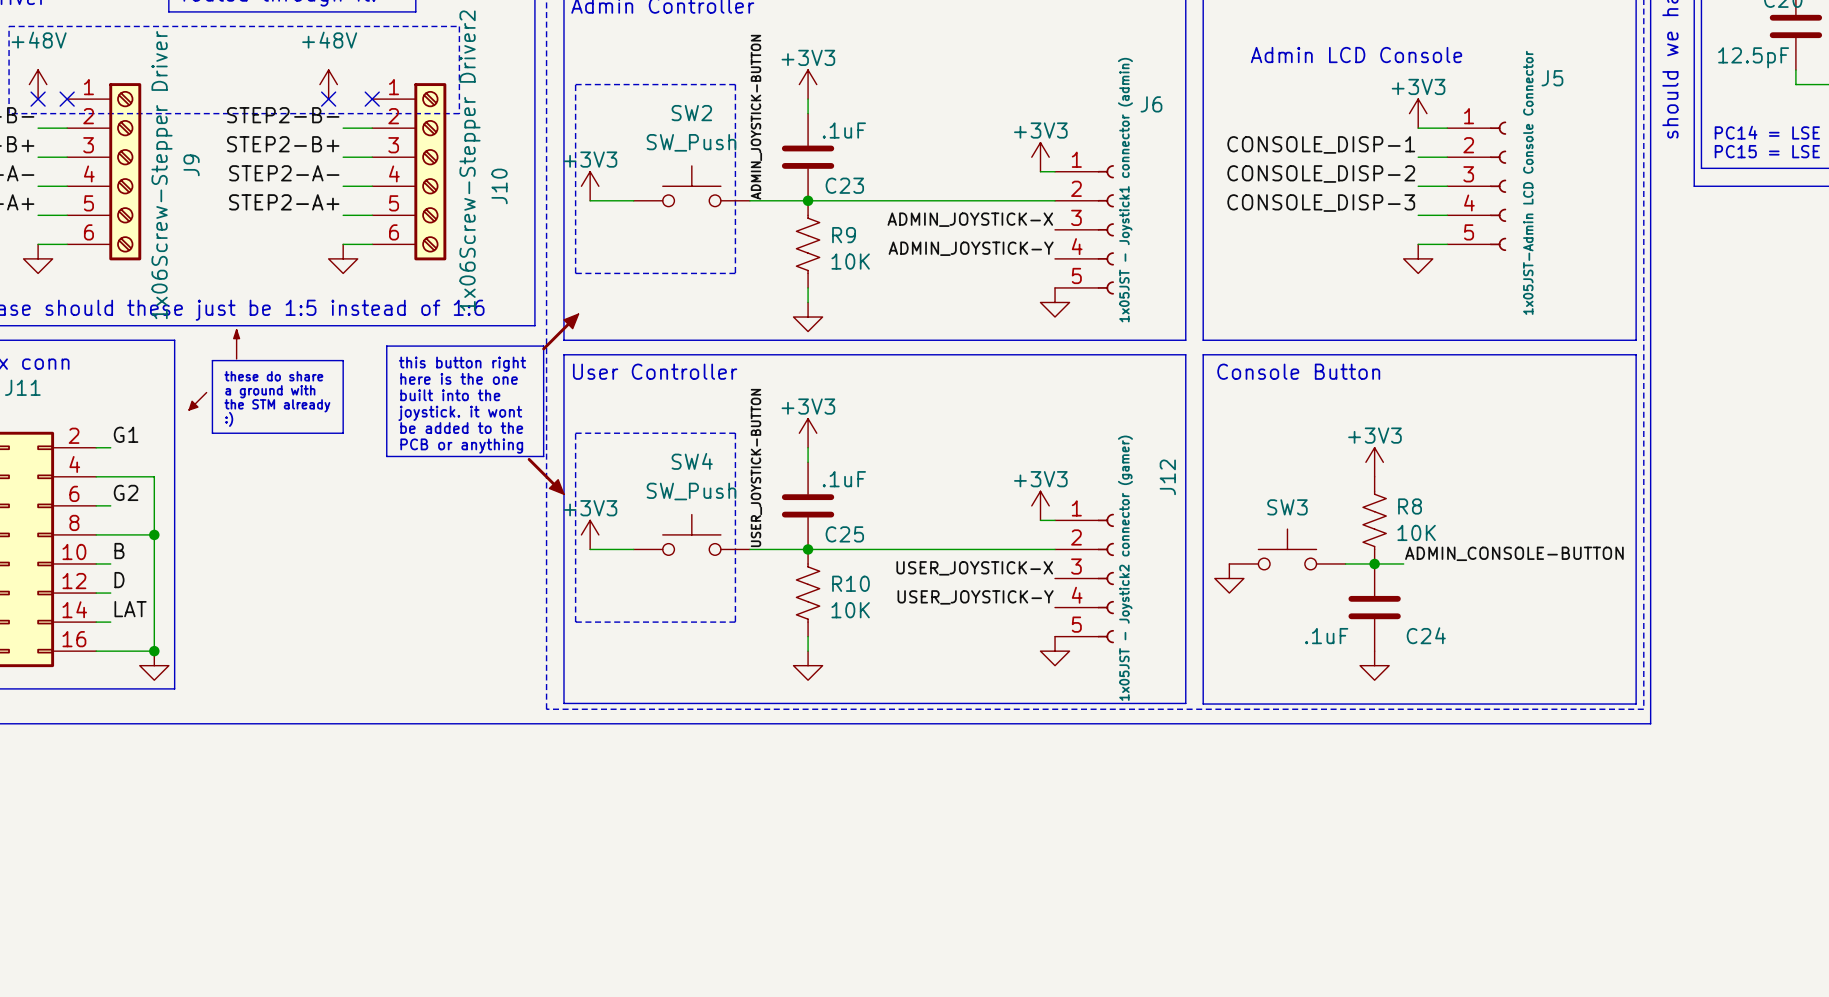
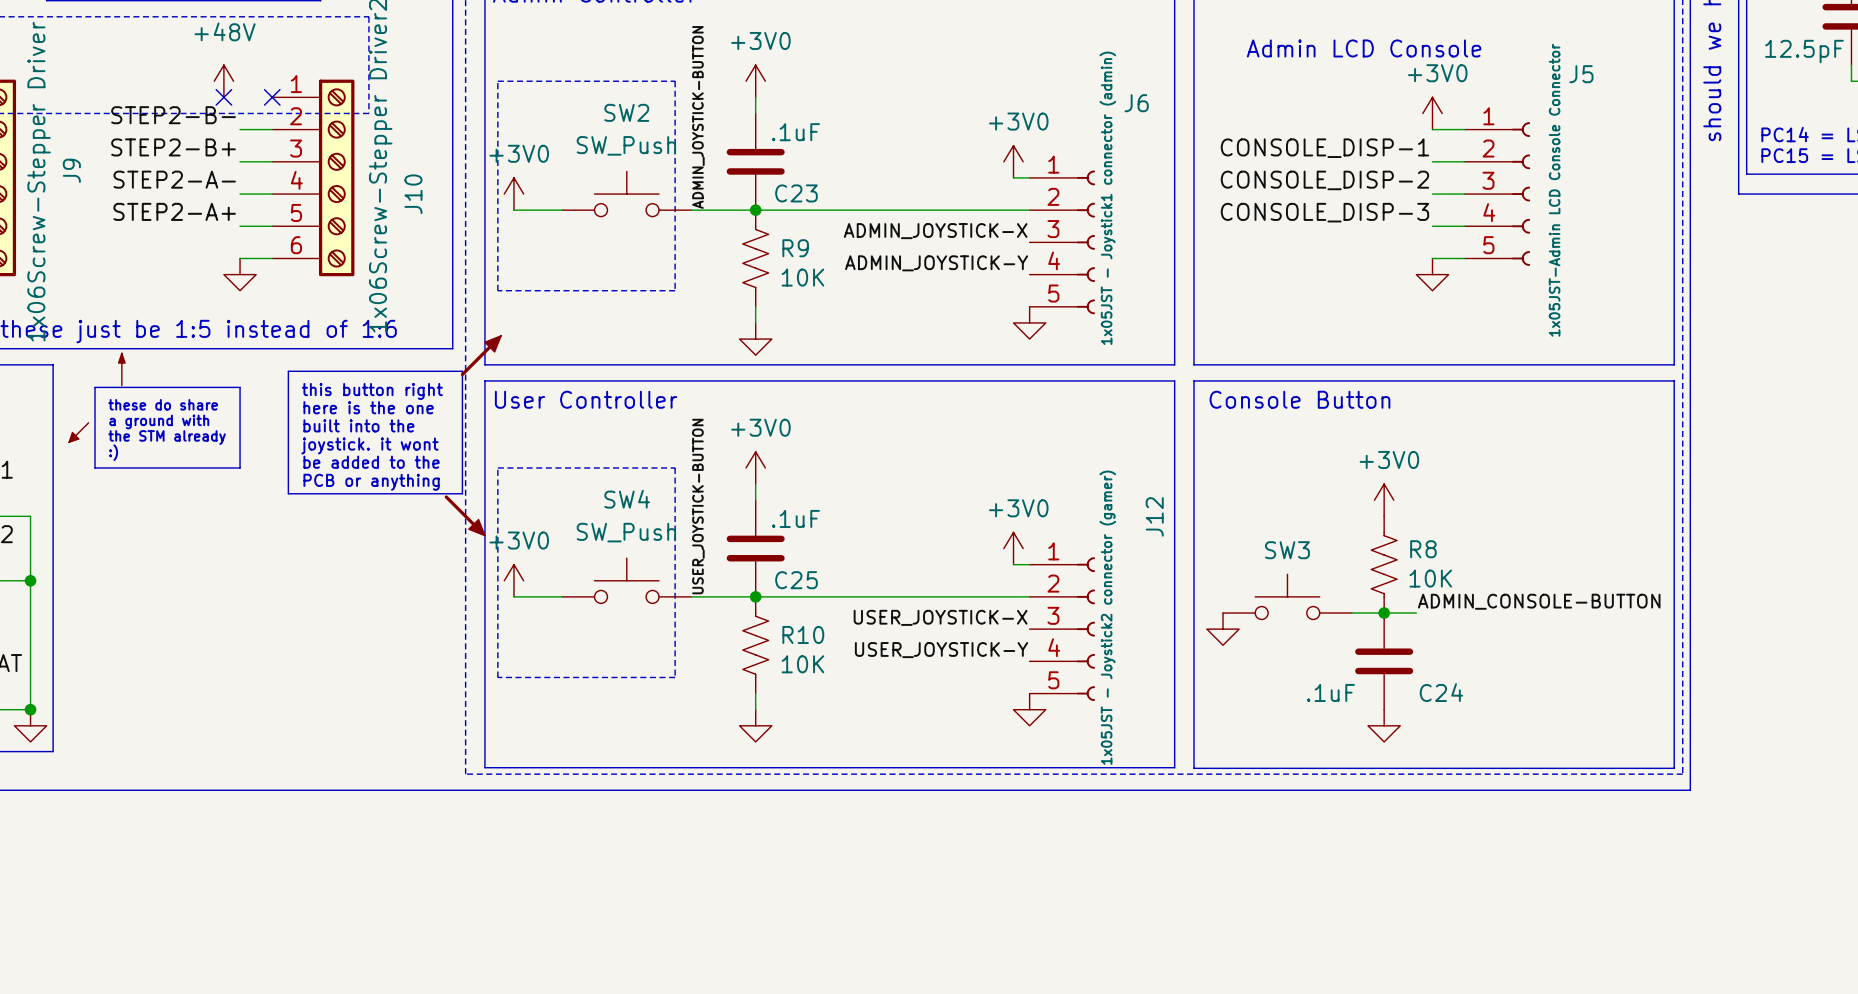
power symbol: +3V3 (808, 84) -> +3V0 (755, 81)
power symbol: +3V3 (1418, 113) -> +3V0 (1432, 113)
power symbol: +3V3 (1040, 157) -> +3V0 (1013, 161)
power symbol: +3V3 (590, 186) -> +3V0 (513, 194)
power symbol: +3V3 (808, 433) -> +3V0 (755, 467)
power symbol: +3V3 (1374, 462) -> +3V0 (1384, 500)
power symbol: +3V3 (1040, 505) -> +3V0 (1013, 548)
power symbol: +3V3 (590, 534) -> +3V0 (513, 580)

